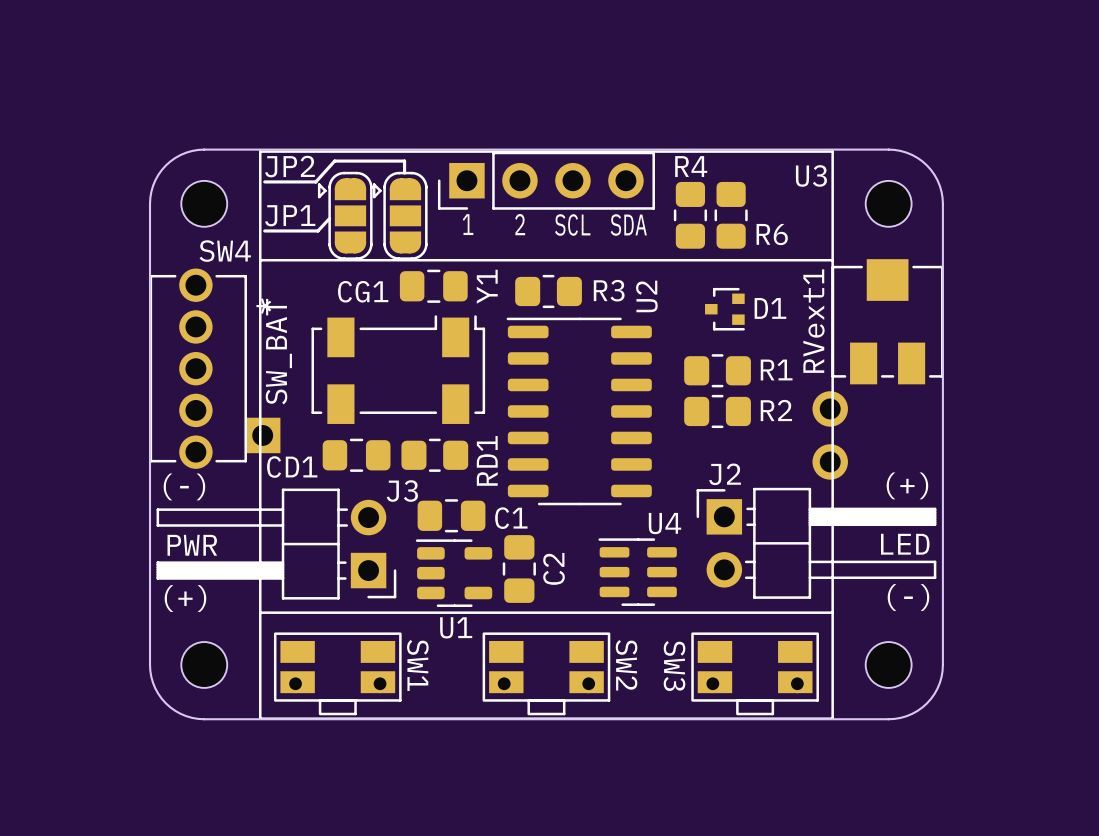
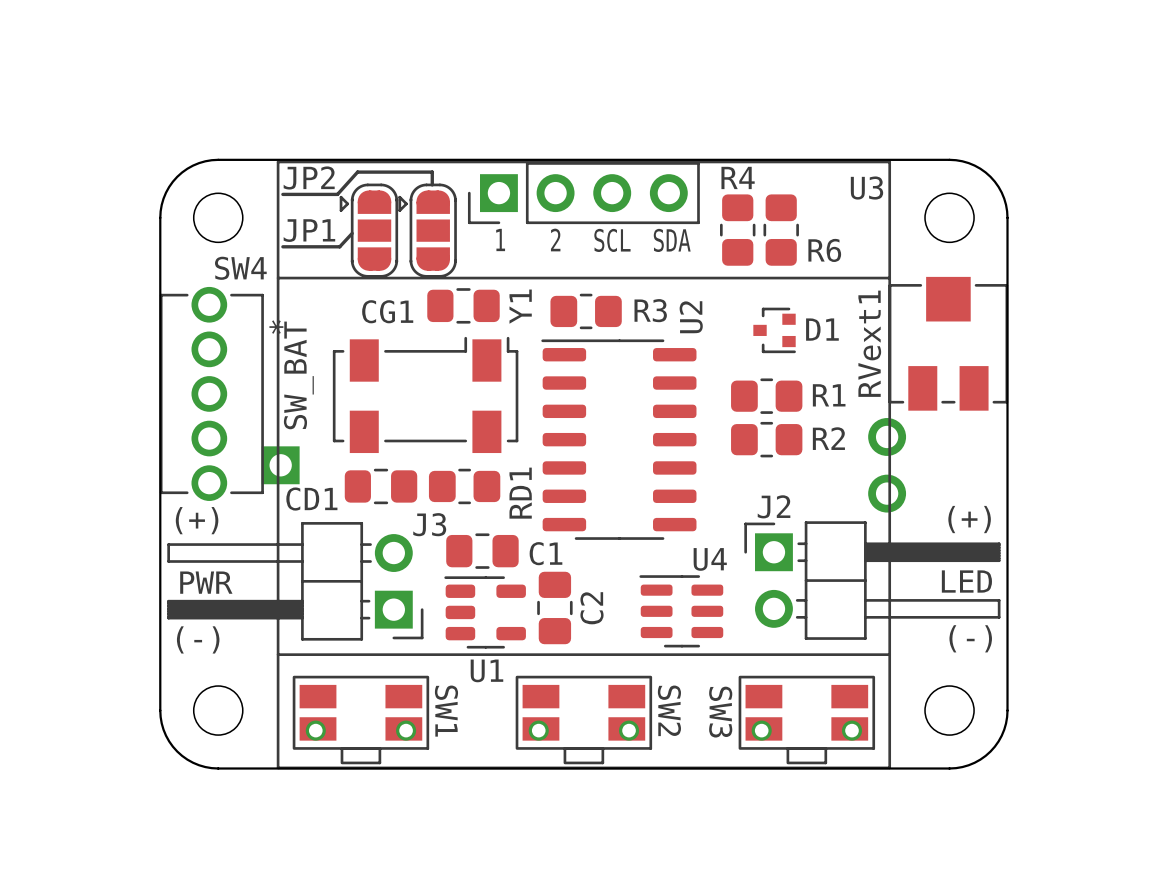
text: (-) (184, 486) -> (+) (197, 520)
text: (+) (185, 598) -> (-) (198, 639)

